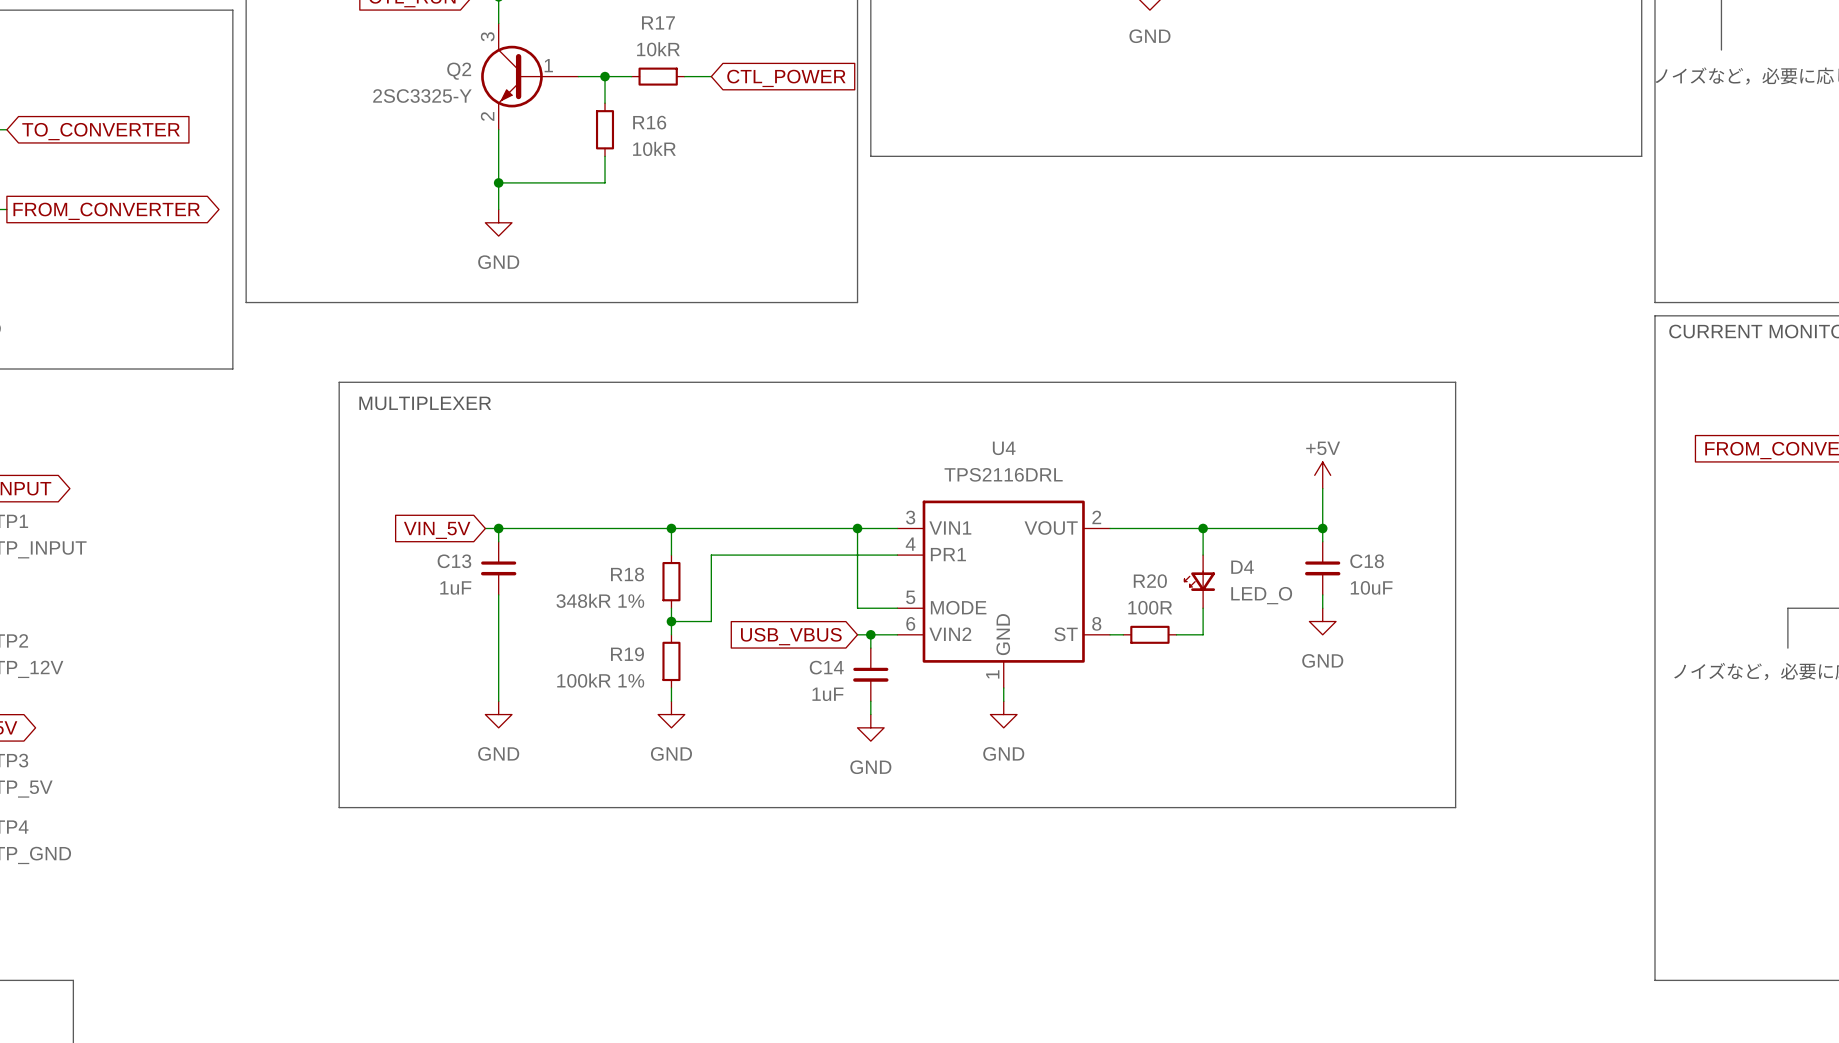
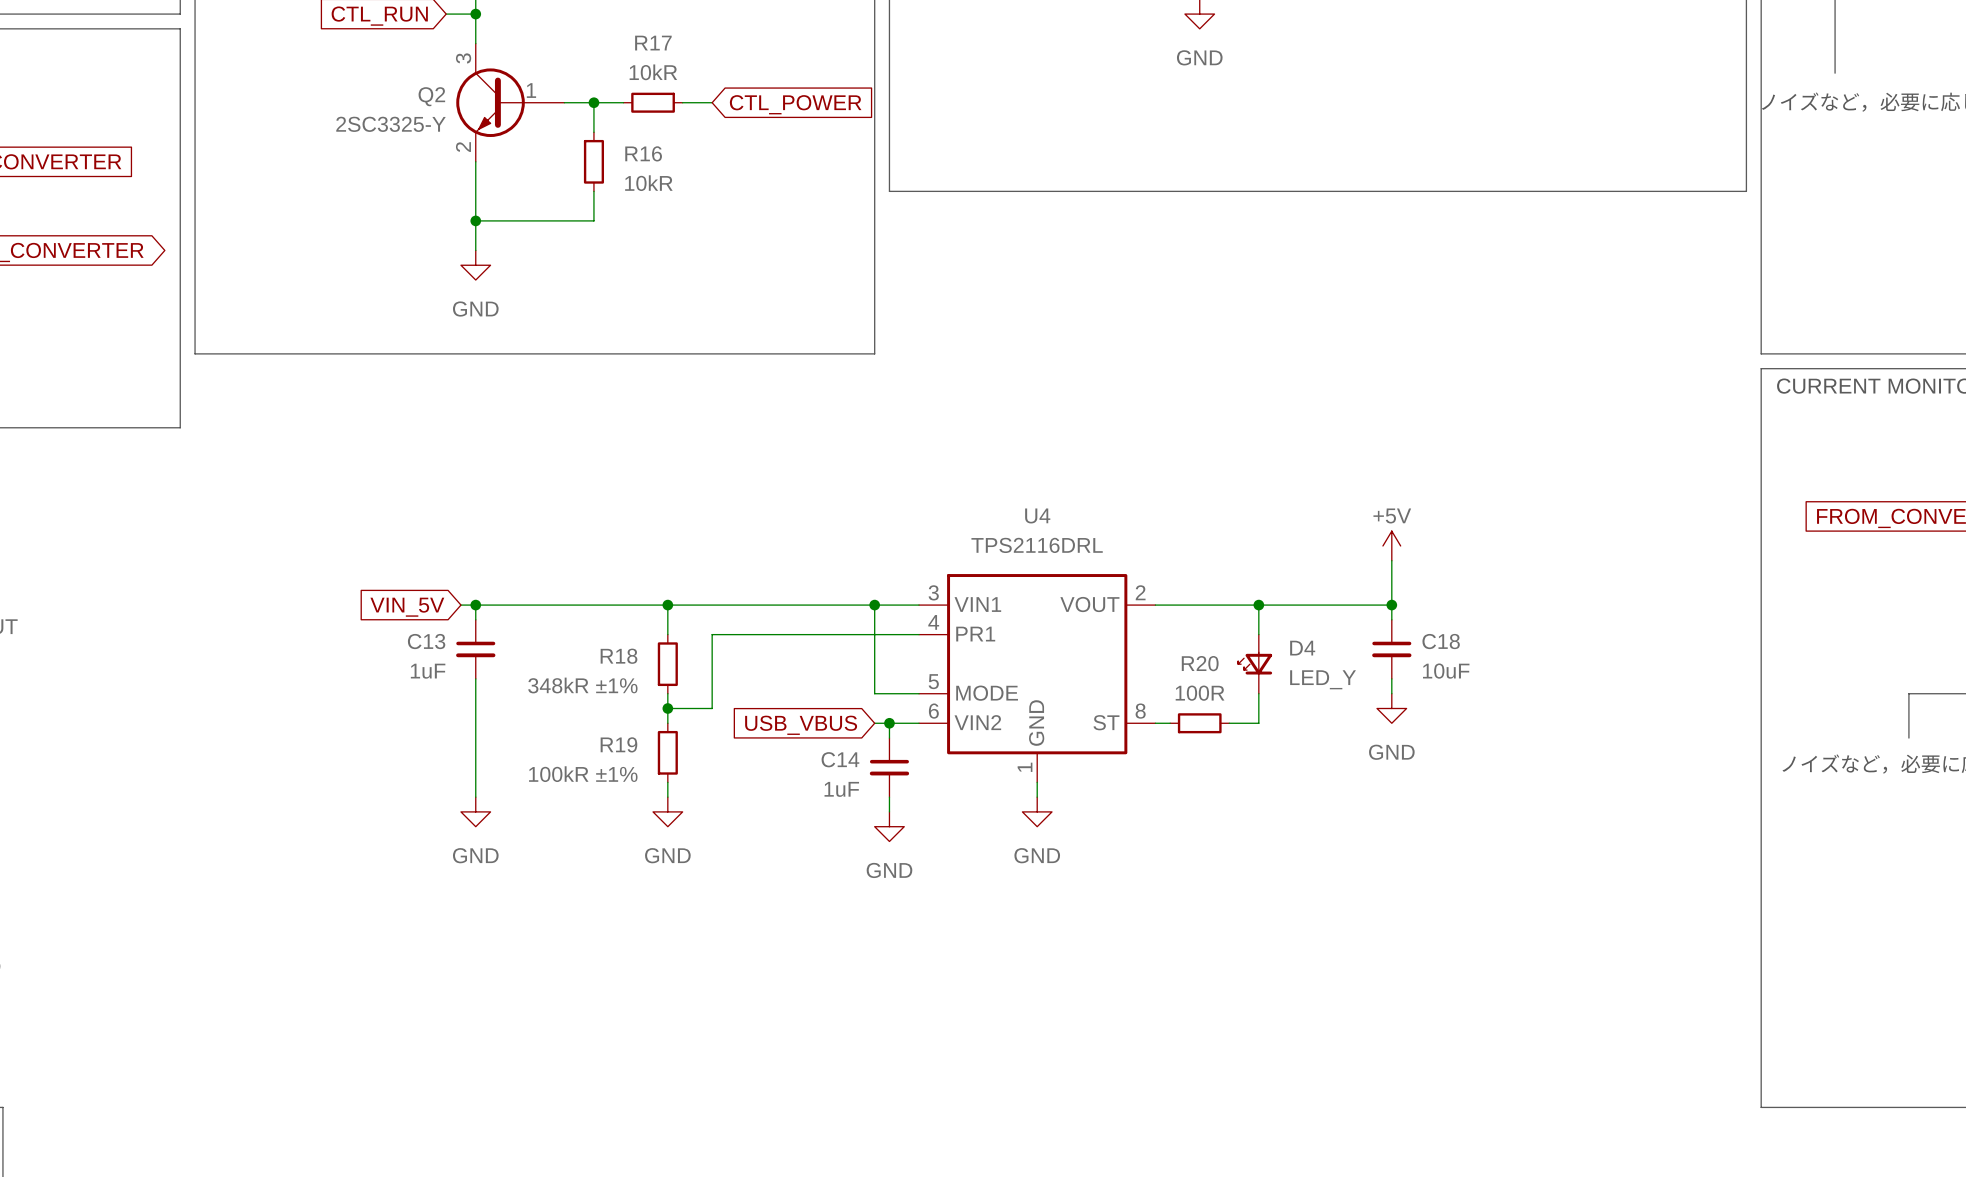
line: (339, 382) (1455, 382) (1455, 807) (339, 807) (339, 382) -> none
text: MULTIPLEXER (425, 403) -> none
D4 value: LED_O (1261, 595) -> LED_Y (1323, 679)
R18 value: 348kR 1% (600, 600) -> 348kR ±1% (582, 685)
R19 value: 100kR 1% (600, 680) -> 100kR ±1% (583, 774)

